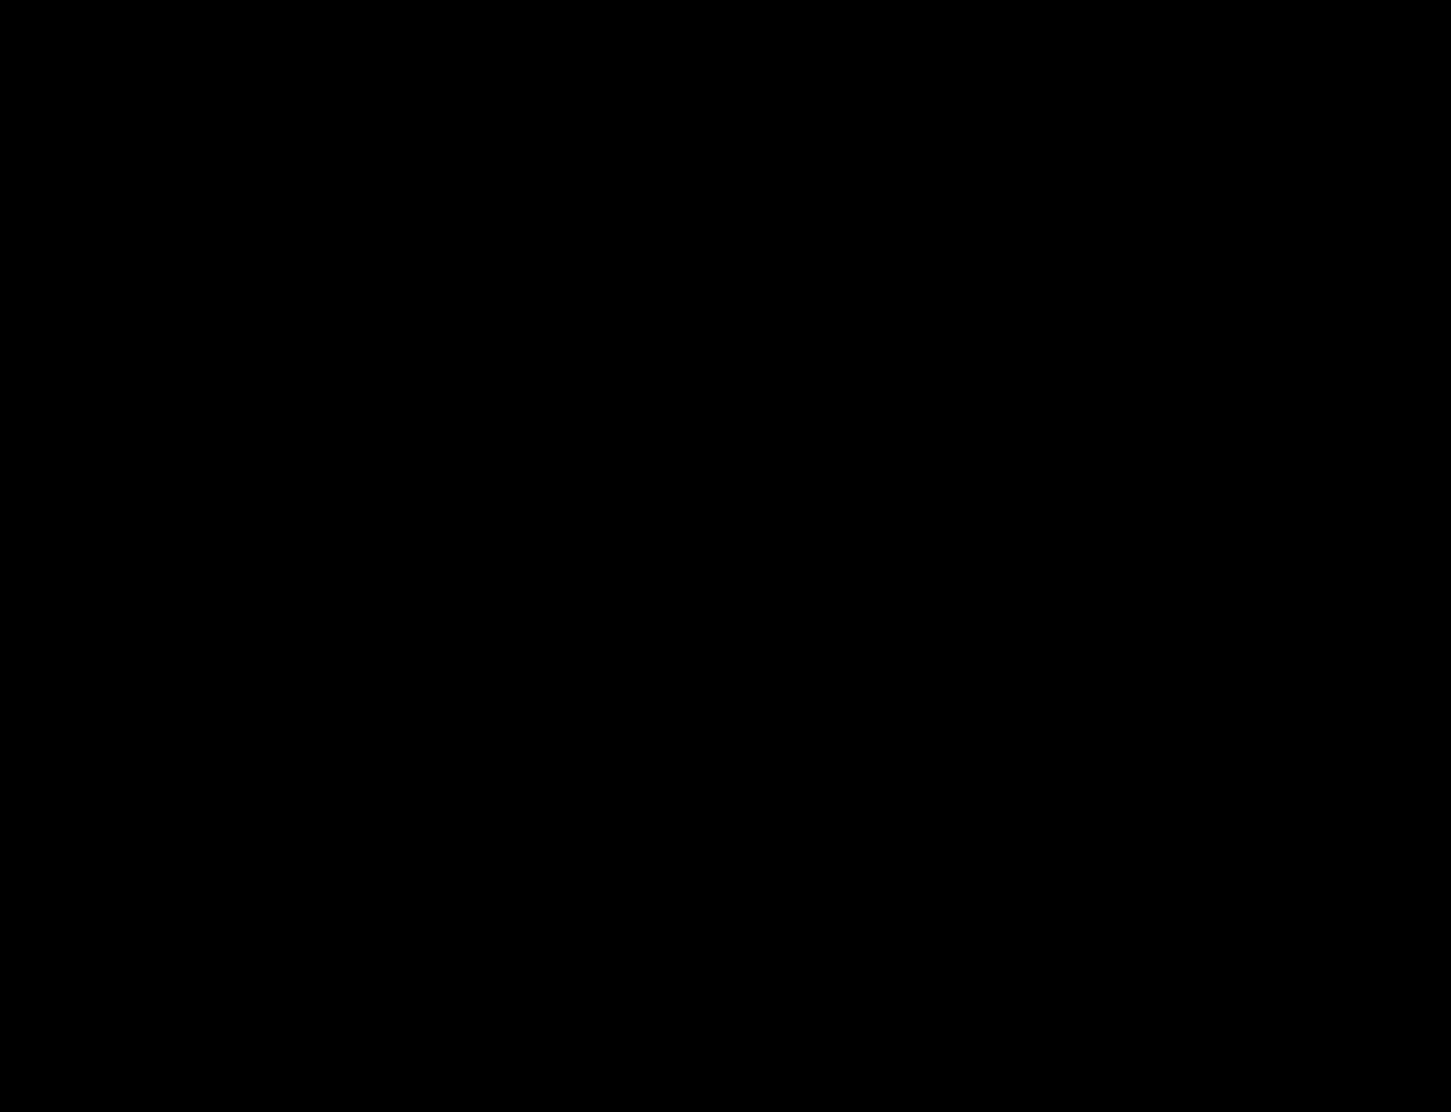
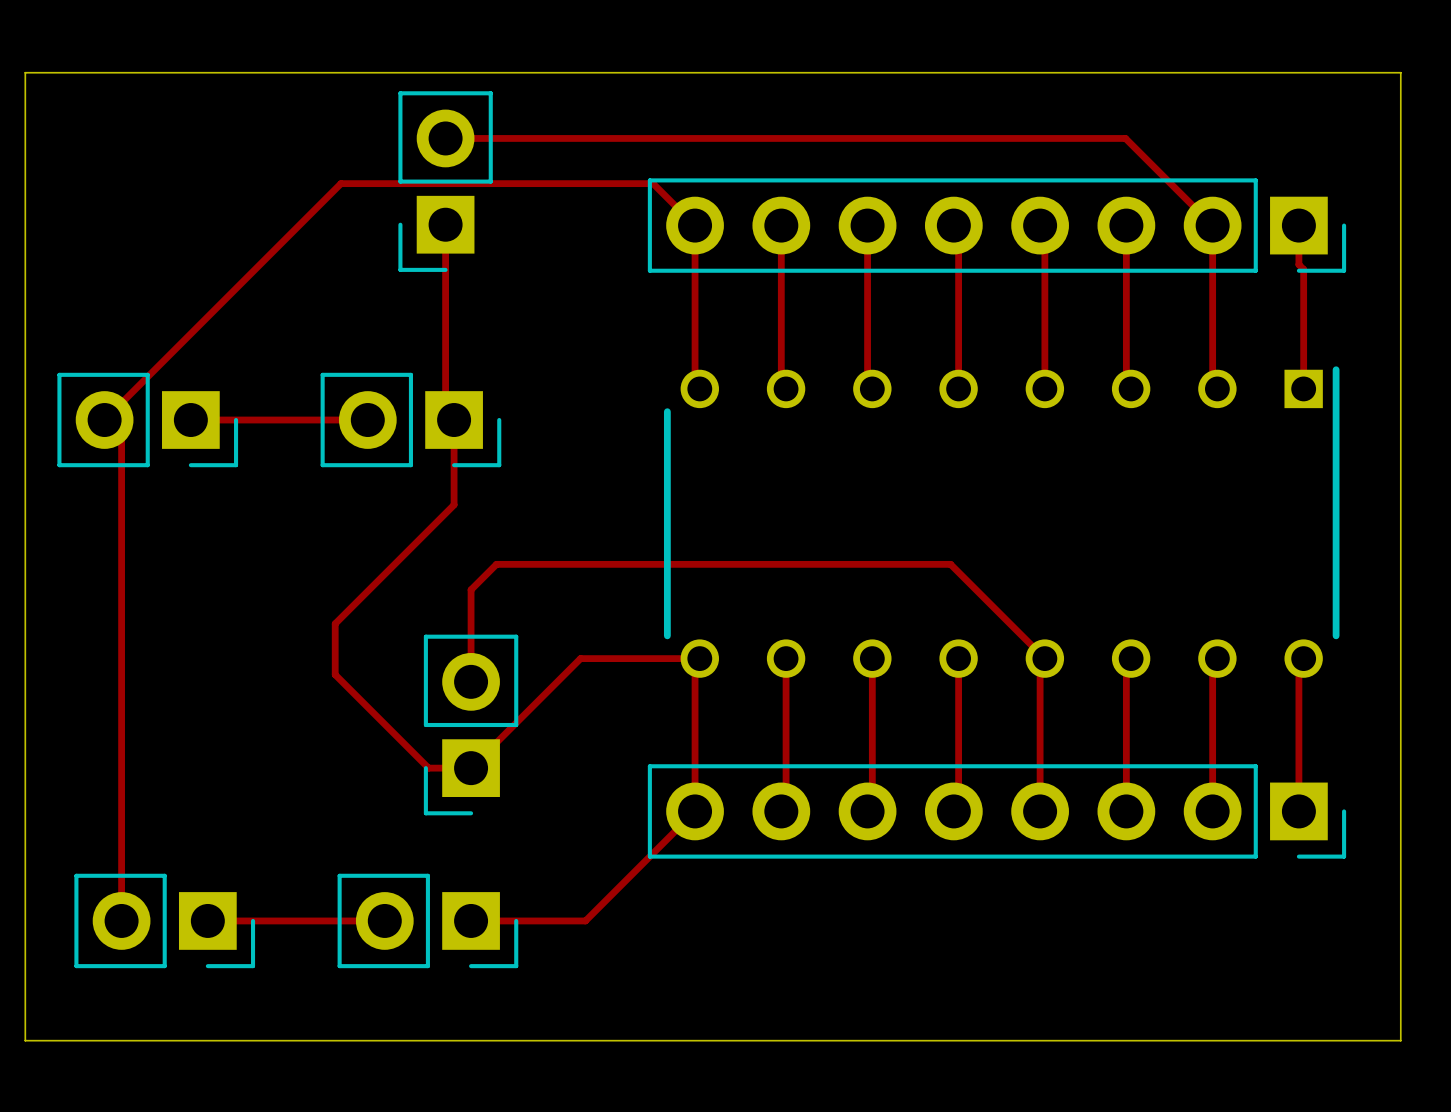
board edge: none -> (25, 72) (1400, 72) (1400, 1040) (25, 1040) (25, 72)
track: none -> (445, 138) (1125, 138) (1212, 225) (1212, 384) (1217, 388)
part: none -> (445, 181)
track: none -> (445, 224) (445, 431) (454, 439)
track: none -> (781, 225) (781, 384) (786, 388)
track: none -> (867, 225) (867, 384) (872, 388)
track: none -> (953, 225) (958, 230) (958, 388)
part: none -> (996, 225)
track: none -> (1040, 225) (1044, 230) (1044, 388)
track: none -> (1126, 225) (1126, 384) (1131, 388)
track: none -> (1298, 225) (1298, 264) (1303, 269) (1303, 388)
track: none -> (699, 388) (695, 384) (695, 225) (653, 183) (340, 183) (104, 420) (121, 436) (121, 920)
part: none -> (147, 420)
track: none -> (190, 420) (367, 420)
part: none -> (410, 420)
track: none -> (454, 420) (454, 504) (335, 623) (335, 674) (428, 768) (471, 768) (580, 658) (699, 658) (695, 663) (695, 811) (585, 920) (471, 920)
part: none -> (1001, 522)
track: none -> (786, 658) (786, 806) (781, 811)
track: none -> (872, 658) (872, 806) (867, 811)
track: none -> (958, 658) (958, 806) (953, 811)
track: none -> (1131, 658) (1126, 663) (1126, 811)
track: none -> (1217, 658) (1212, 663) (1212, 811)
track: none -> (1303, 658) (1298, 663) (1298, 811)
track: none -> (471, 681) (471, 589) (496, 564) (950, 564) (1044, 658) (1040, 663) (1040, 811)
part: none -> (471, 725)
part: none -> (996, 811)
part: none -> (164, 920)
track: none -> (207, 920) (384, 920)
part: none -> (427, 920)

